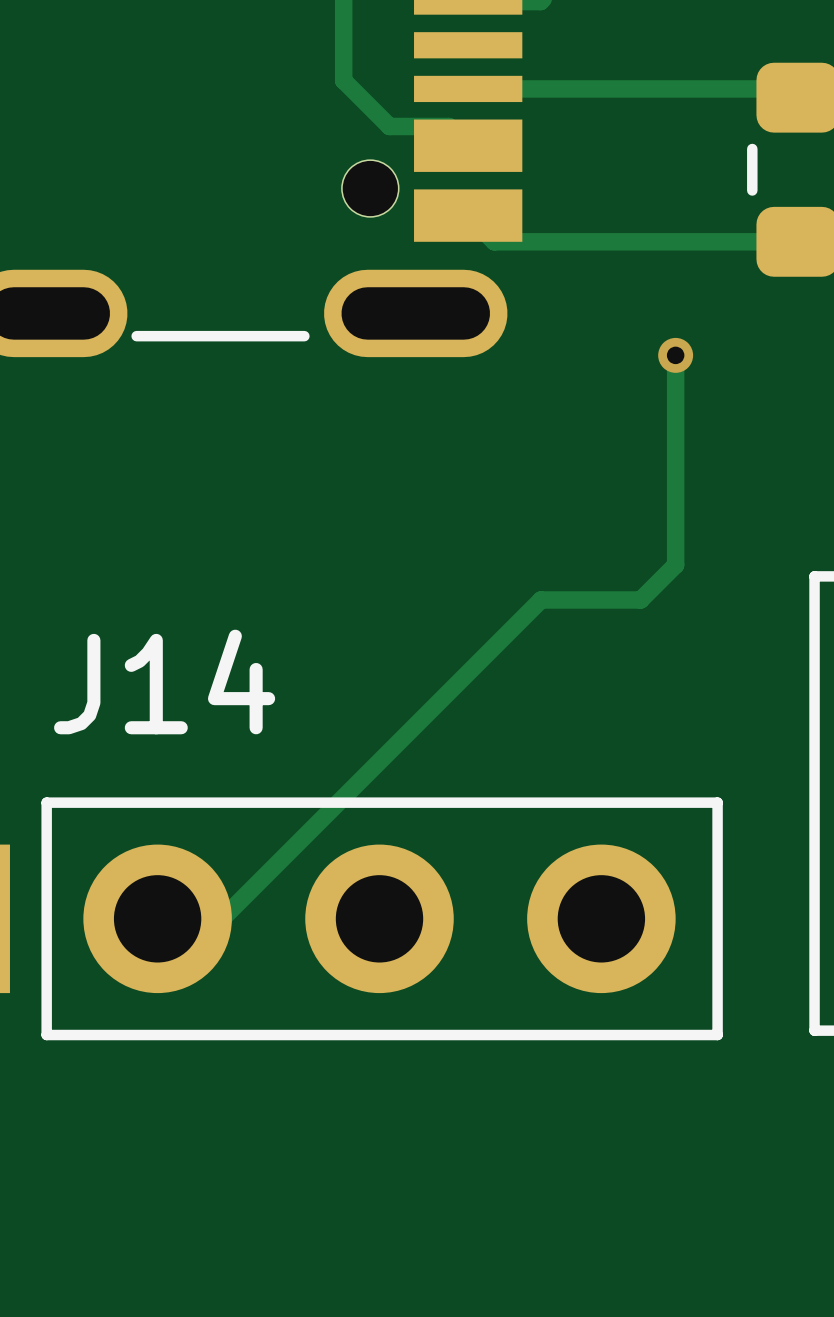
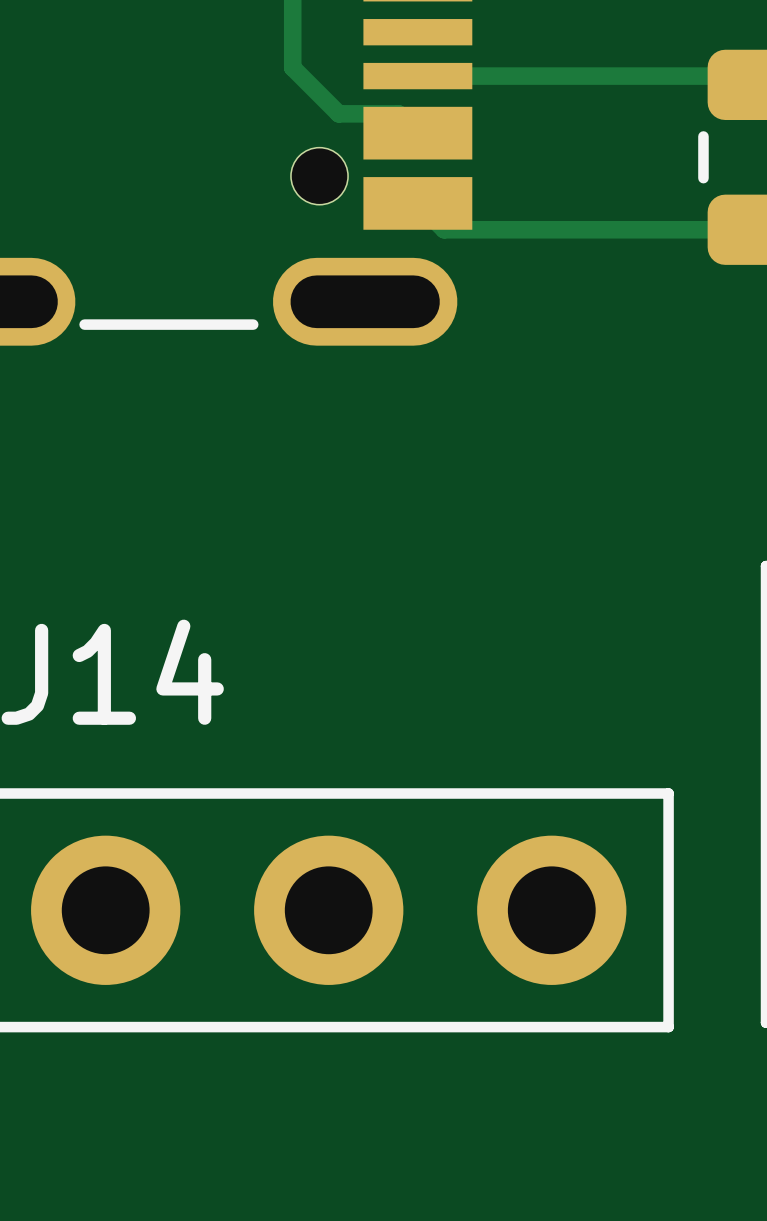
track: (675, 355) (675, 565) (640, 599) (541, 599) (222, 918) (157, 918) -> none
via: (675, 355) -> none

